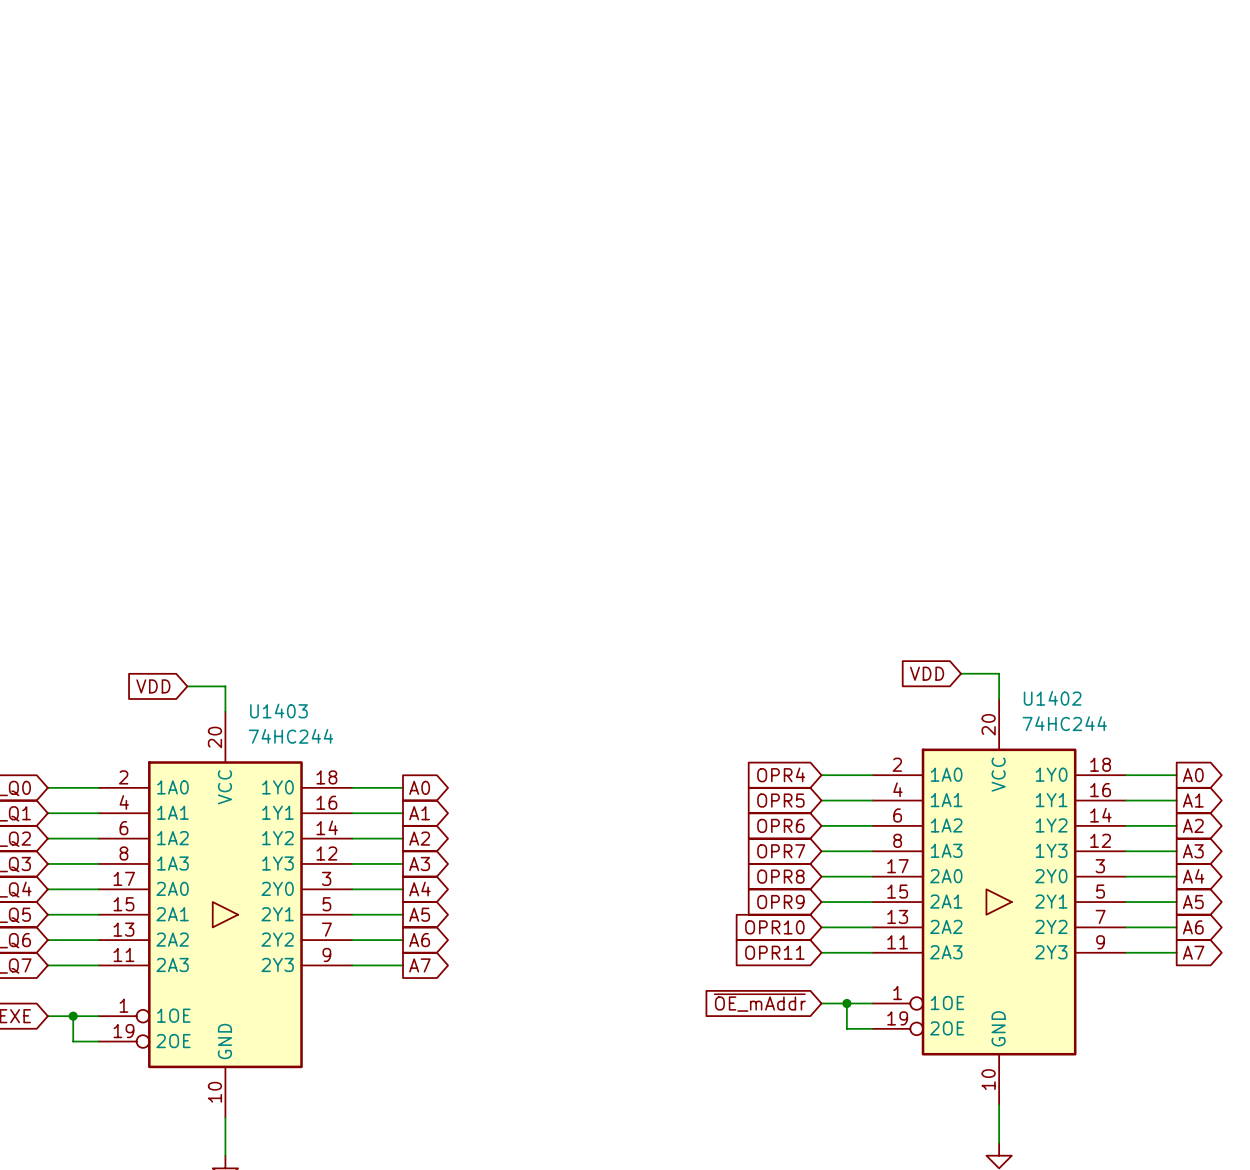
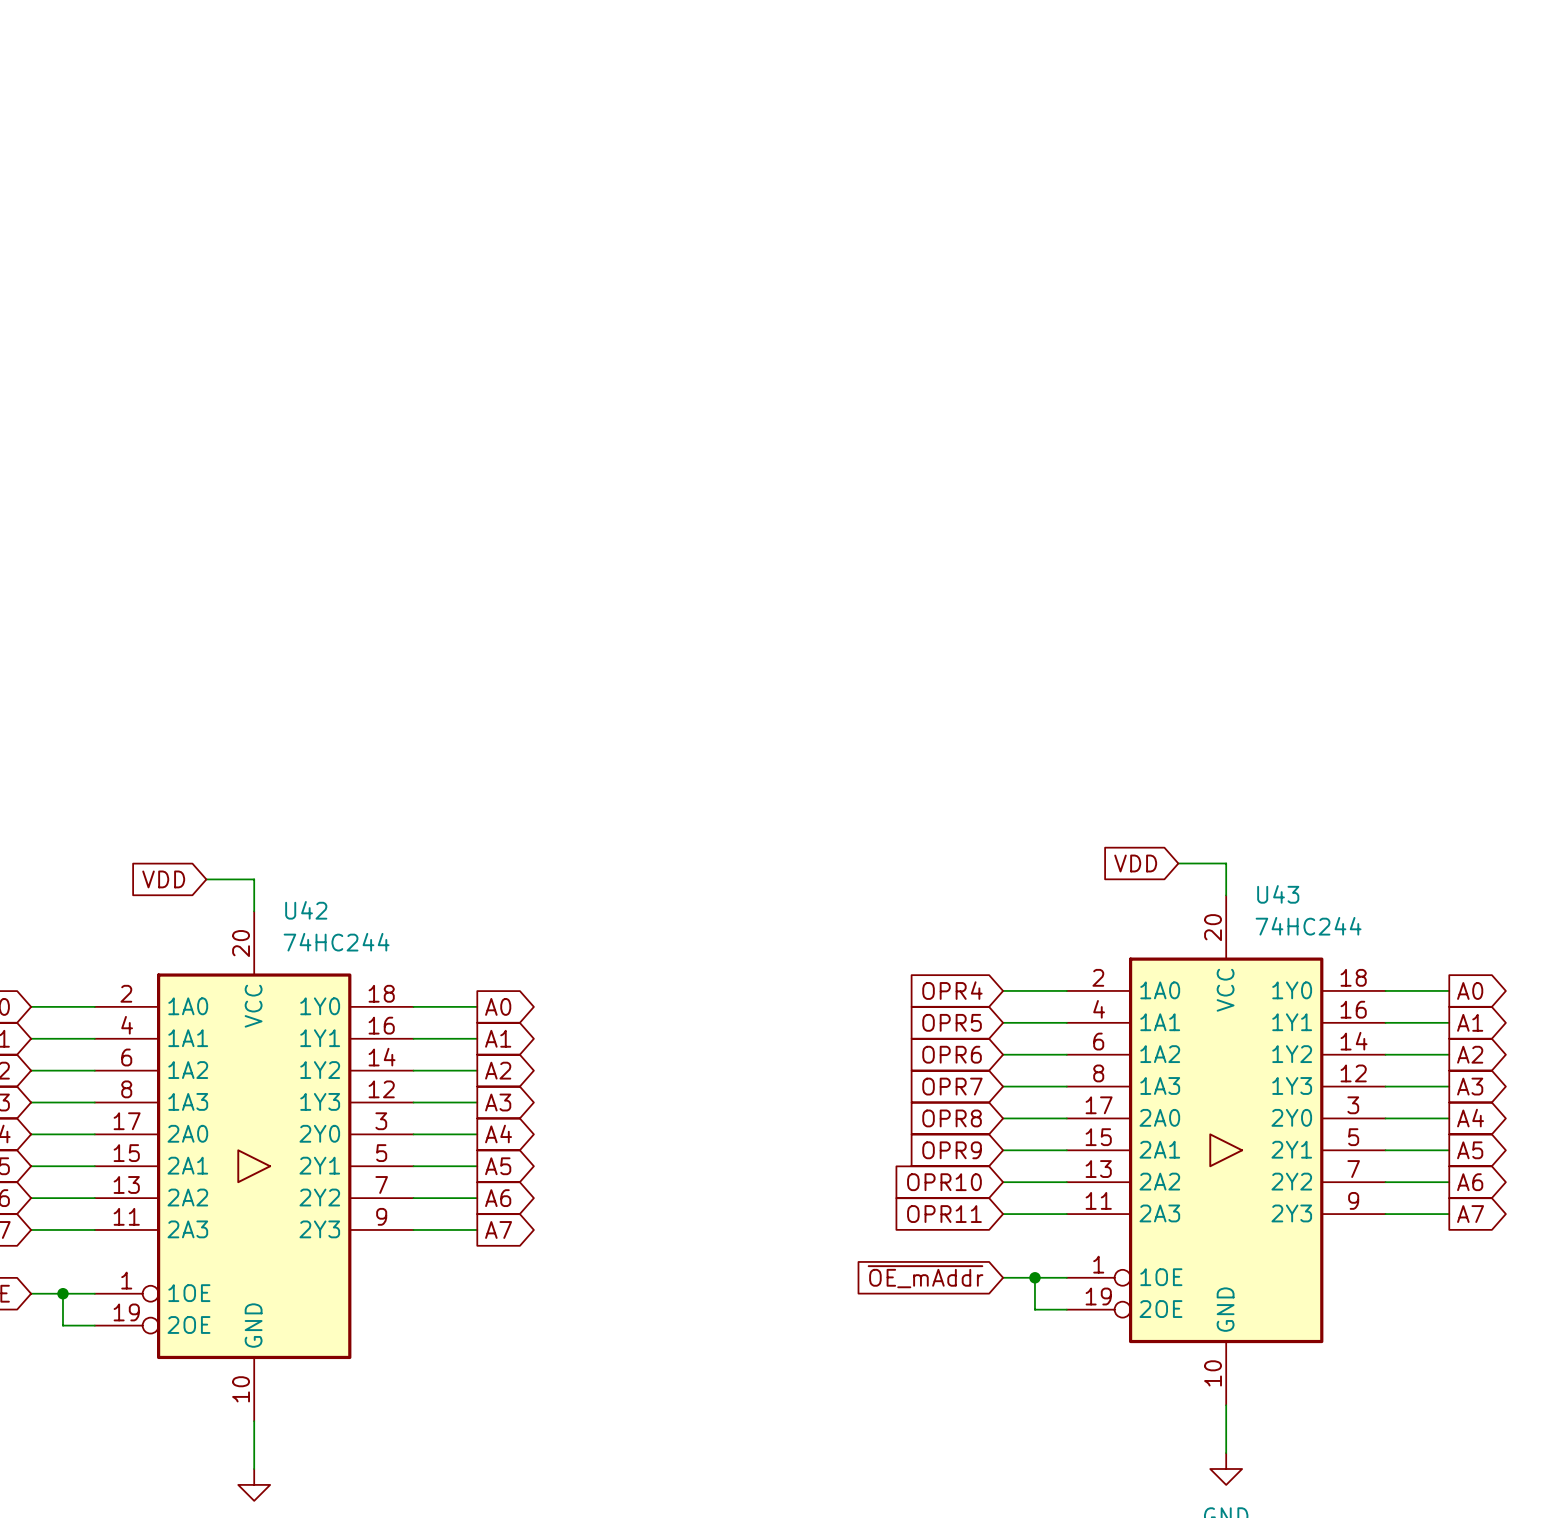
U1402 name: U1402 (1052, 698) -> U43 (1278, 894)
U1403 name: U1403 (278, 711) -> U42 (306, 910)

